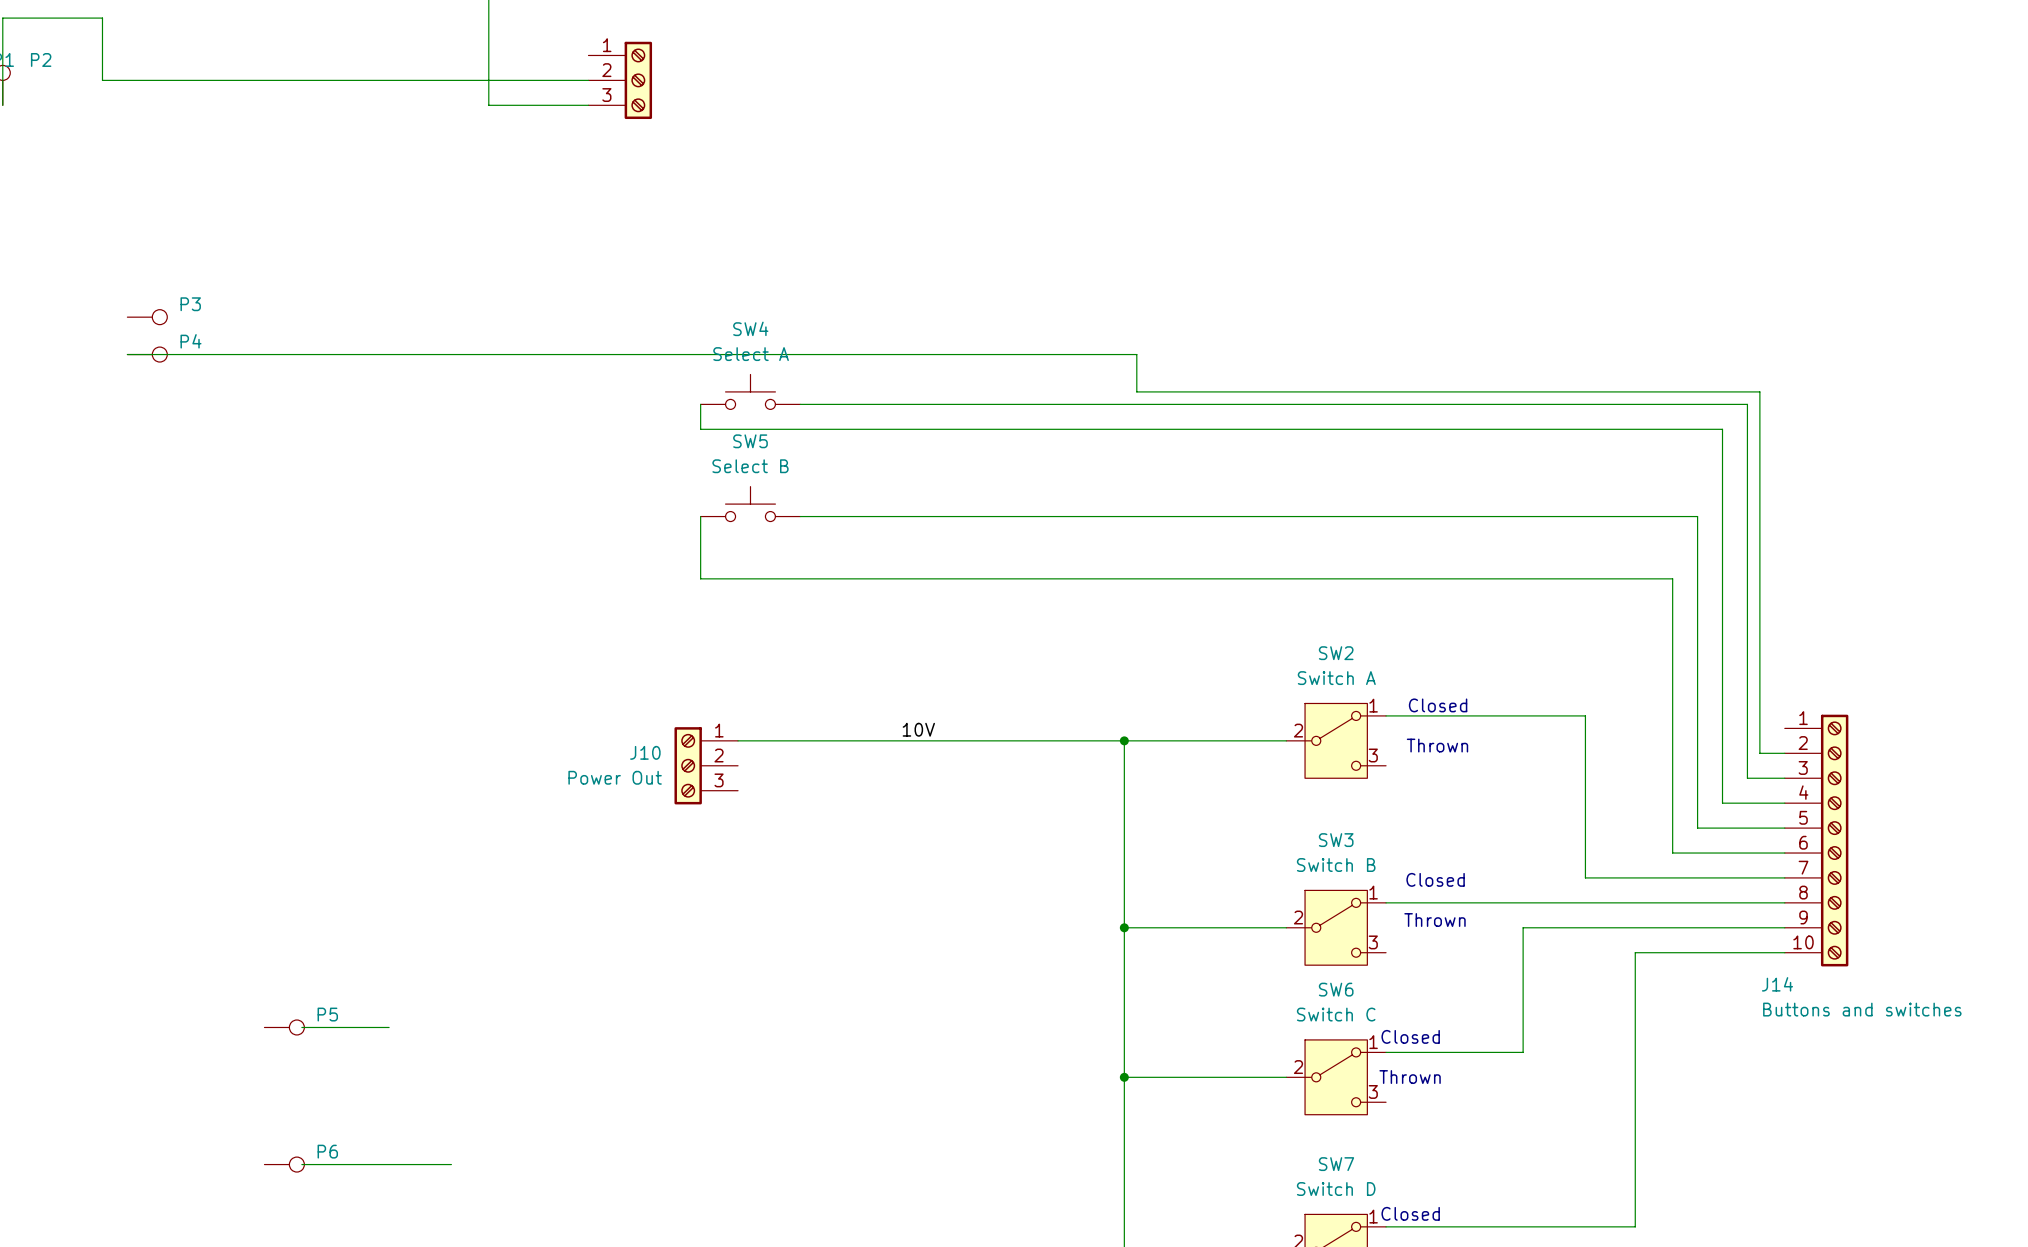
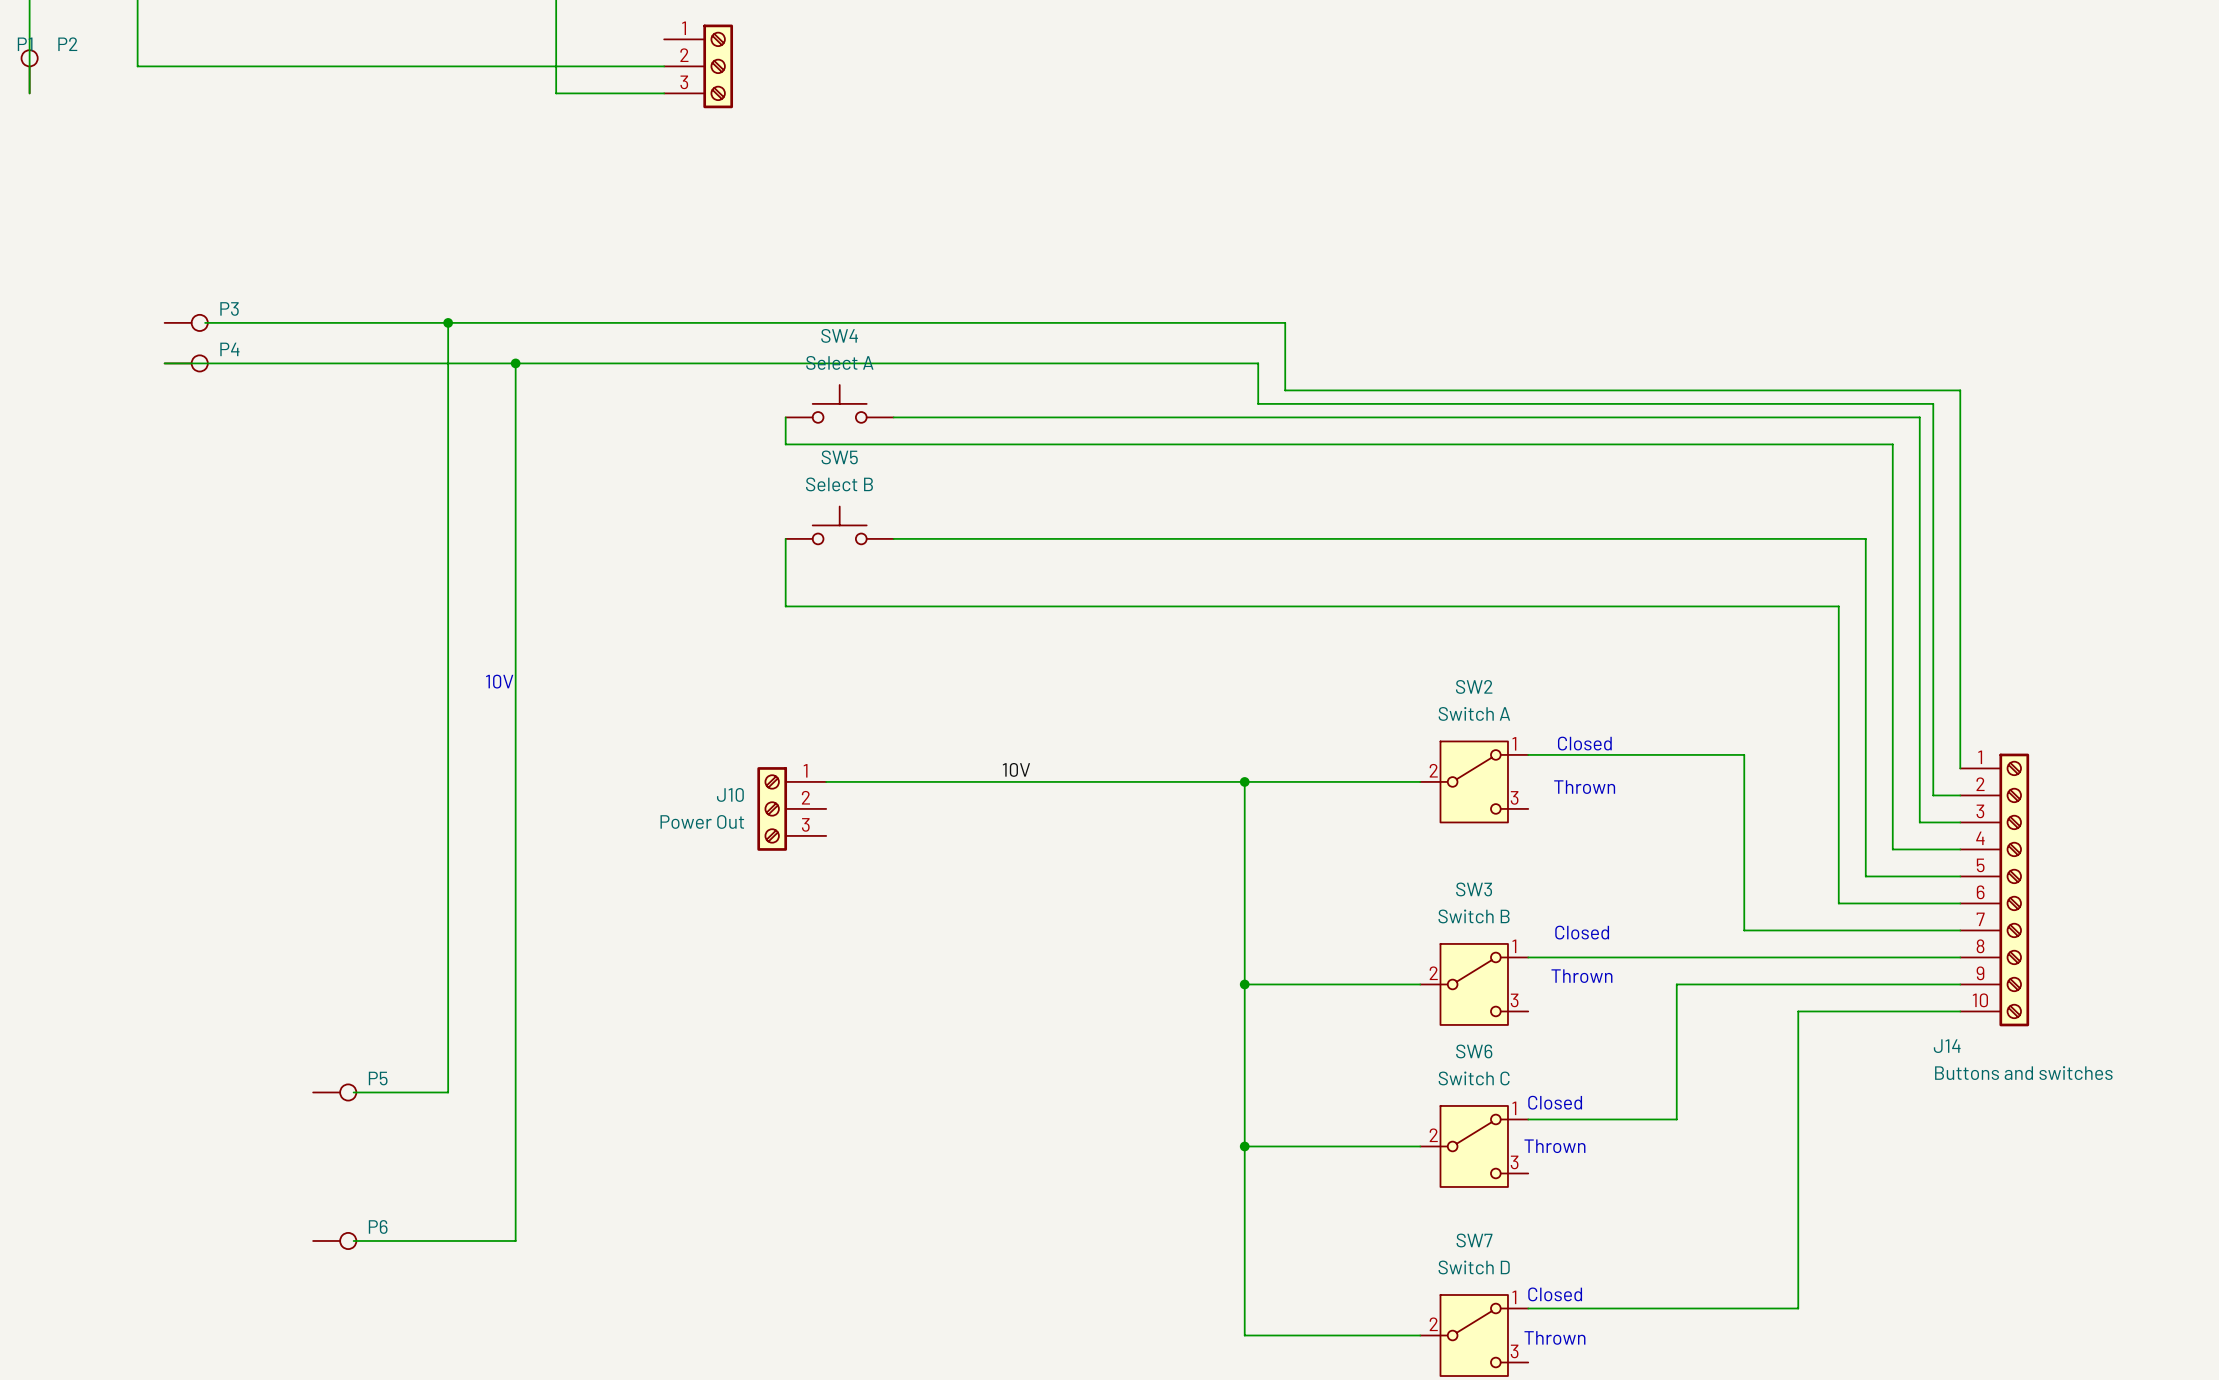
wire: none -> (205, 322) (1285, 322) (1285, 390) (1960, 390) (1960, 768)
wire: none -> (448, 322) (448, 1092)
junction: none -> (448, 322)
wire: none -> (515, 363) (515, 1240)
junction: none -> (515, 363)
text: none -> 10V (499, 681)

